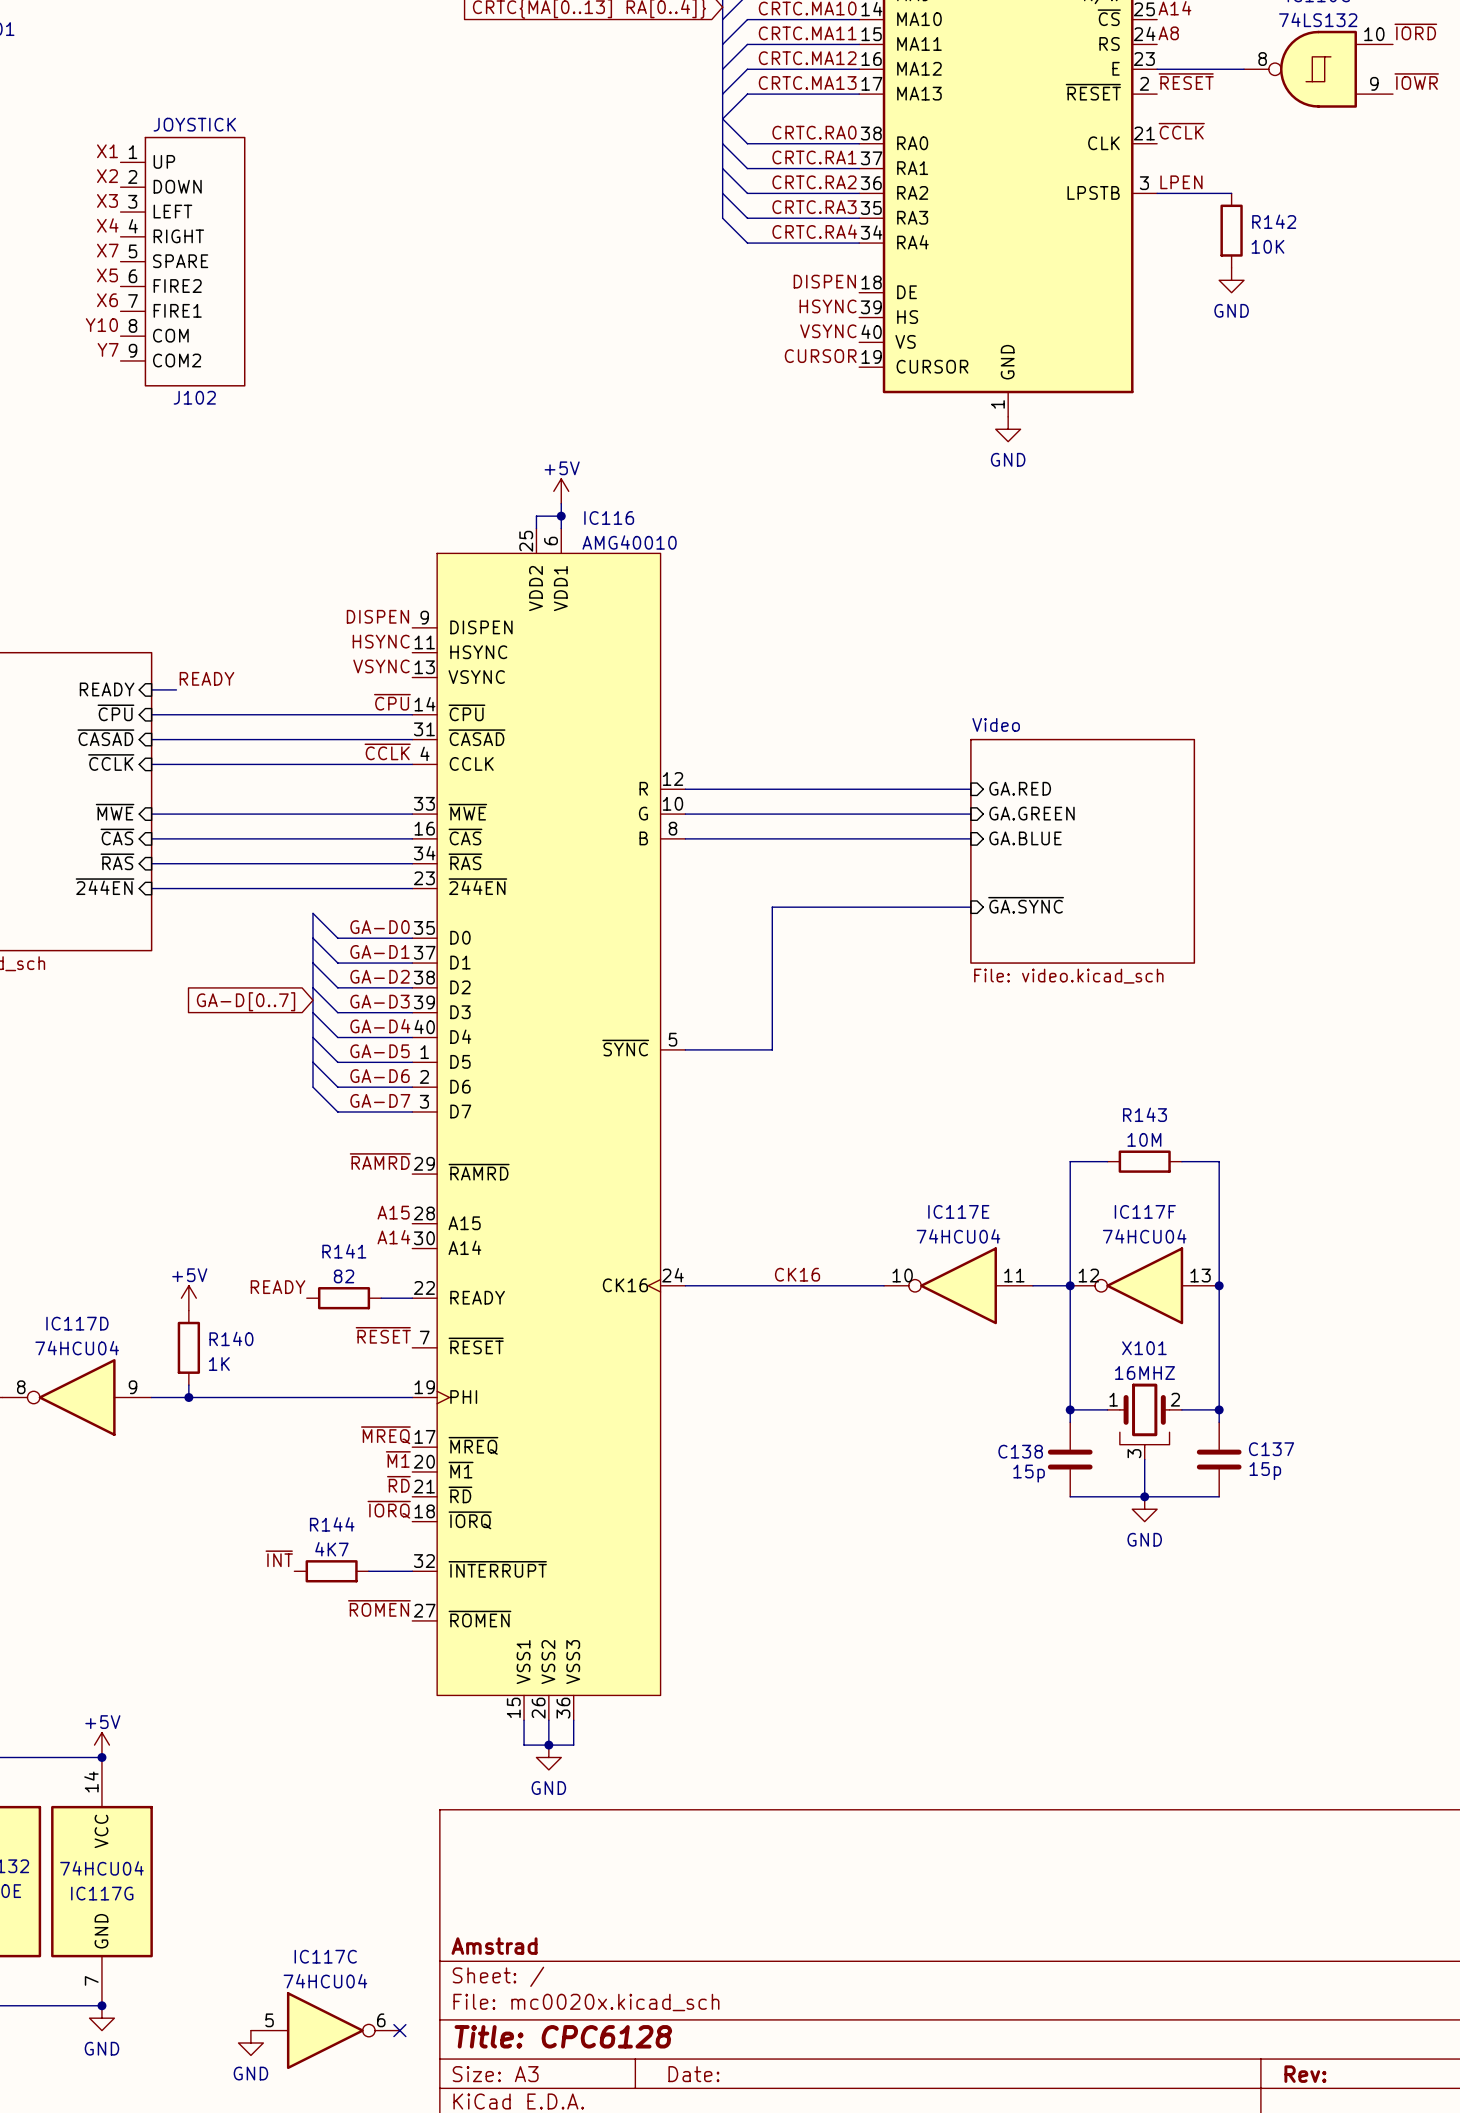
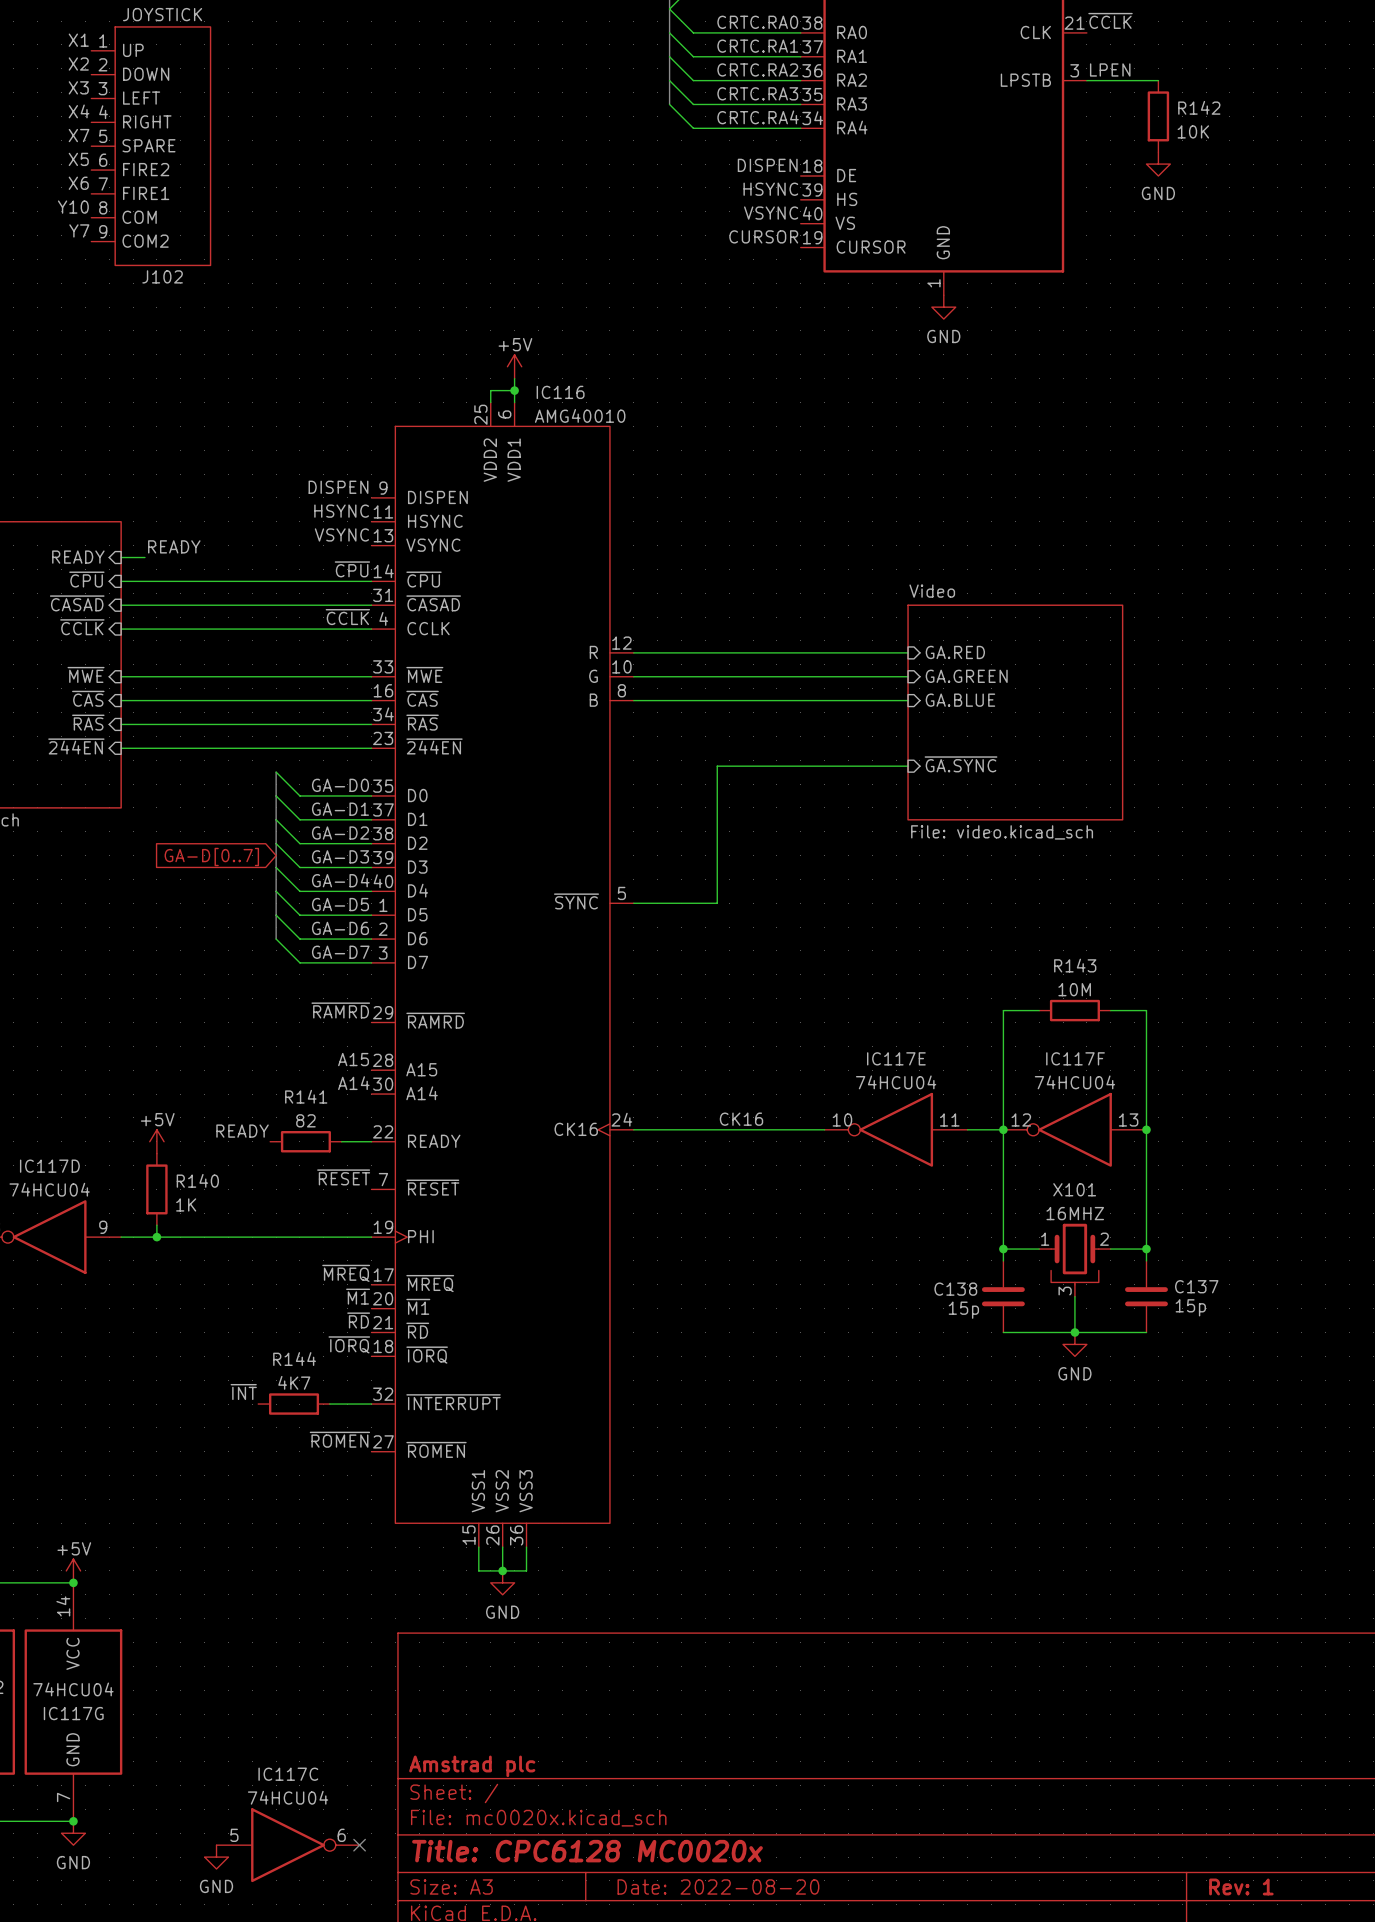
title block: Amstrad (494, 1946) -> Amstrad plc (472, 1766)
title block: Title: CPC6128 (563, 2036) -> Title: CPC6128 MC0020x (587, 1851)
title block: Date: (693, 2074) -> Date: 2022-08-20 (718, 1886)
title block: Rev: (1305, 2074) -> Rev: 1 (1241, 1886)

